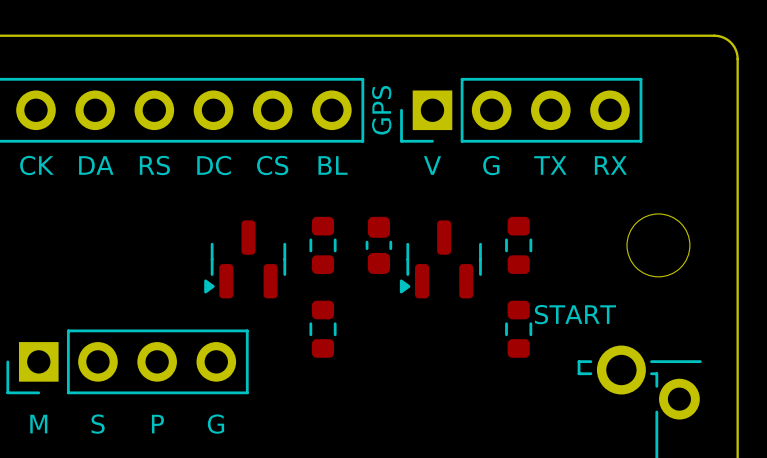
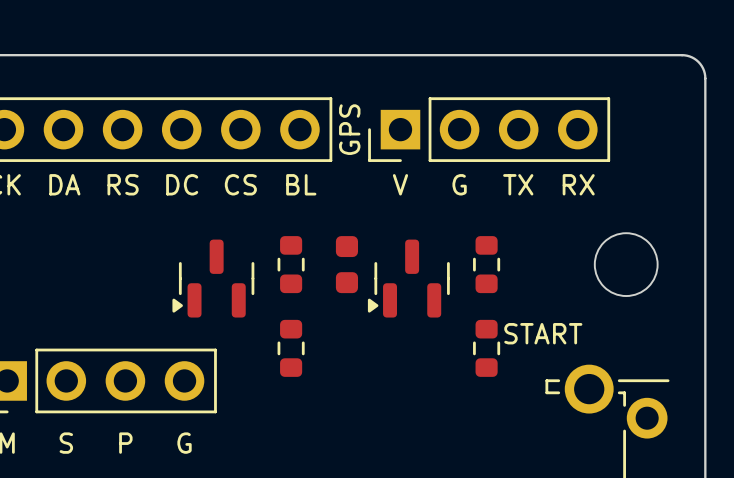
part footprint: [365, 216, 393, 274] -> [335, 236, 359, 294]

